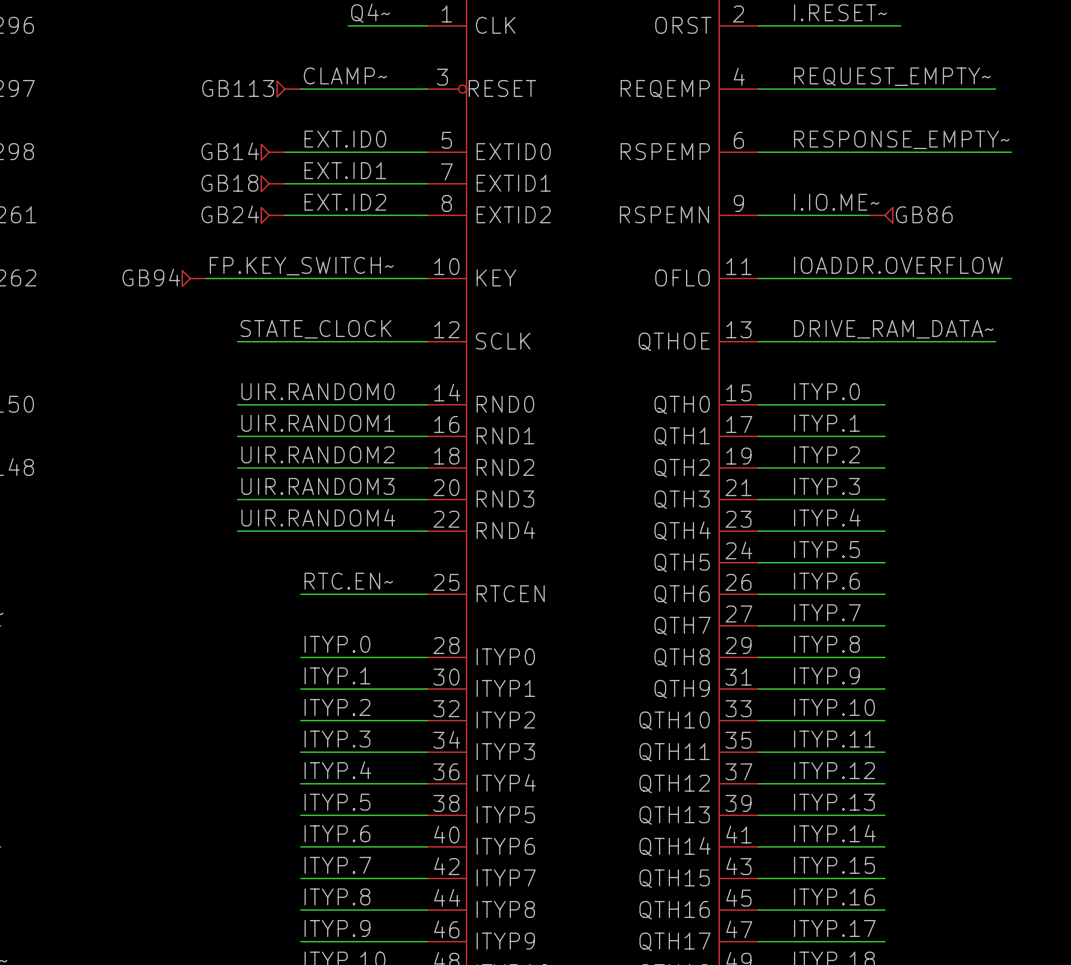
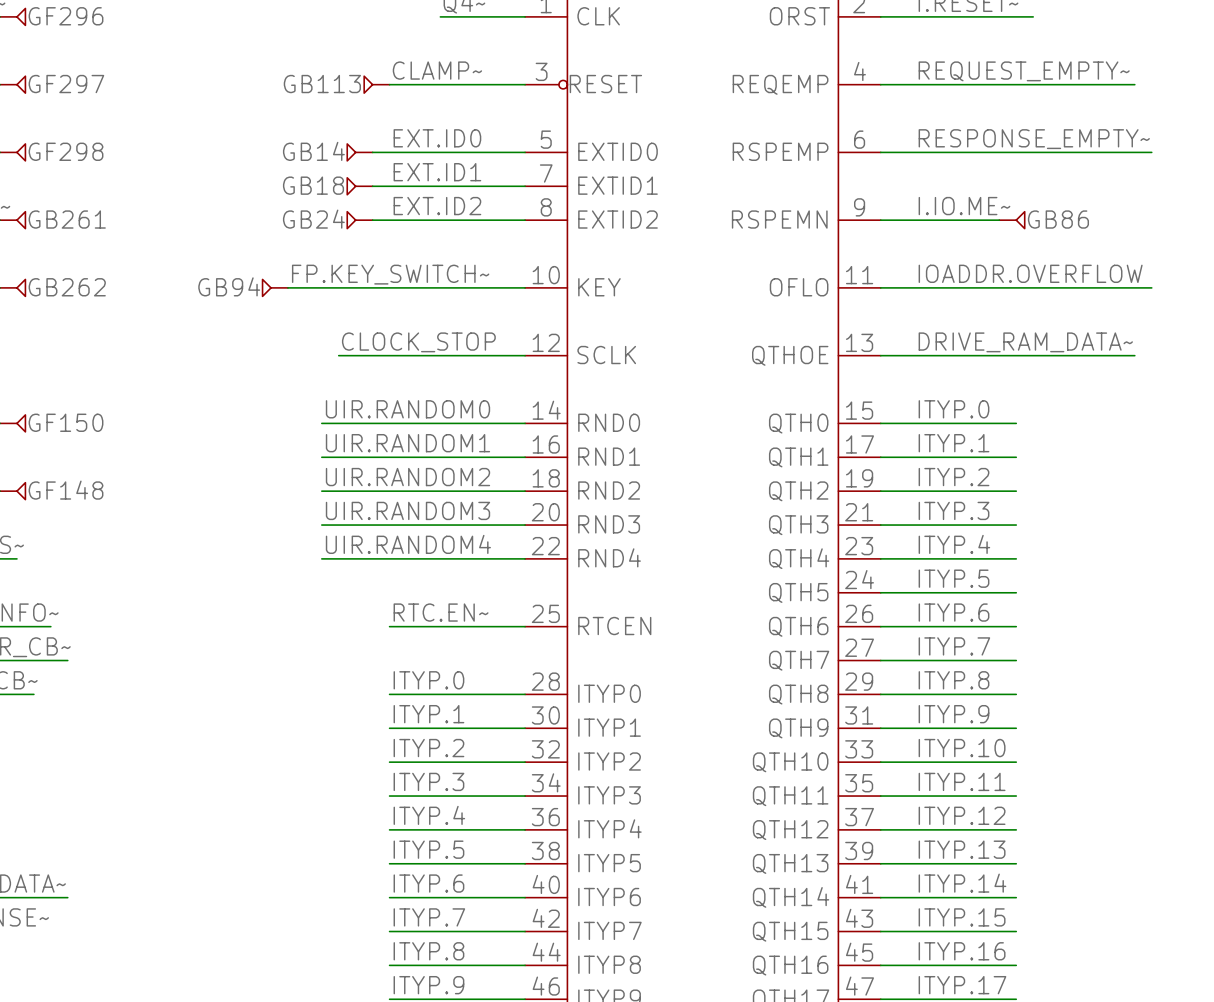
label: STATE_CLOCK (316, 329) -> none
label: none -> CLOCK_STOP (418, 342)
wire: (237, 341) (253, 341) -> none

